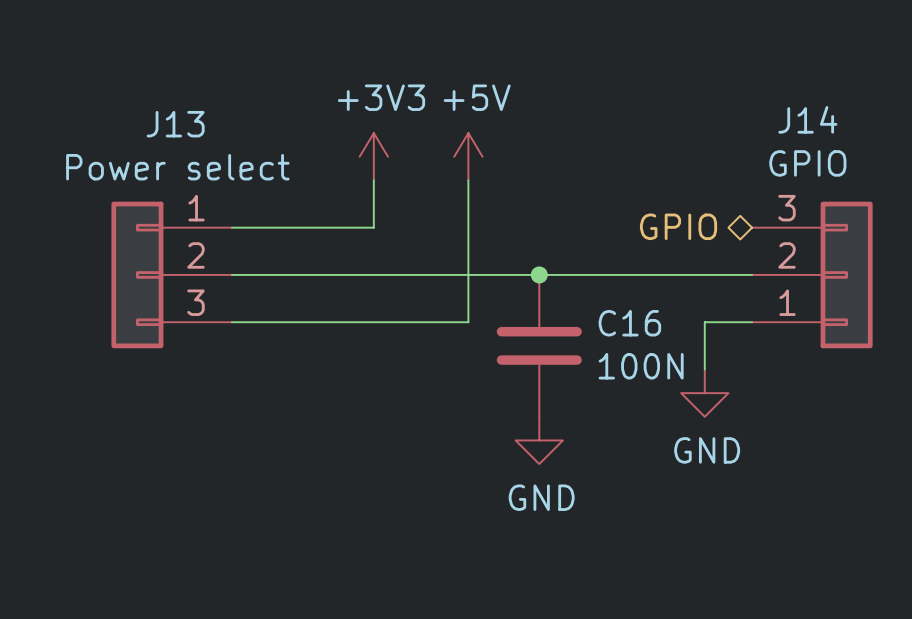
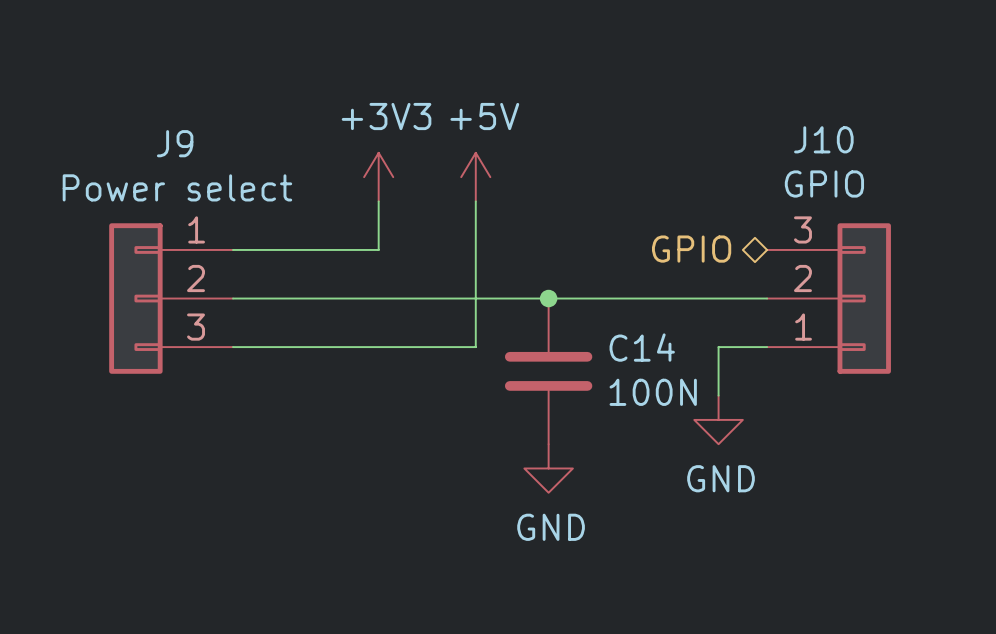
J14 name: J14 (807, 119) -> J10 (823, 139)
J13 name: J13 (175, 124) -> J9 (175, 143)
C16 name: C16 (629, 323) -> C14 (642, 347)

